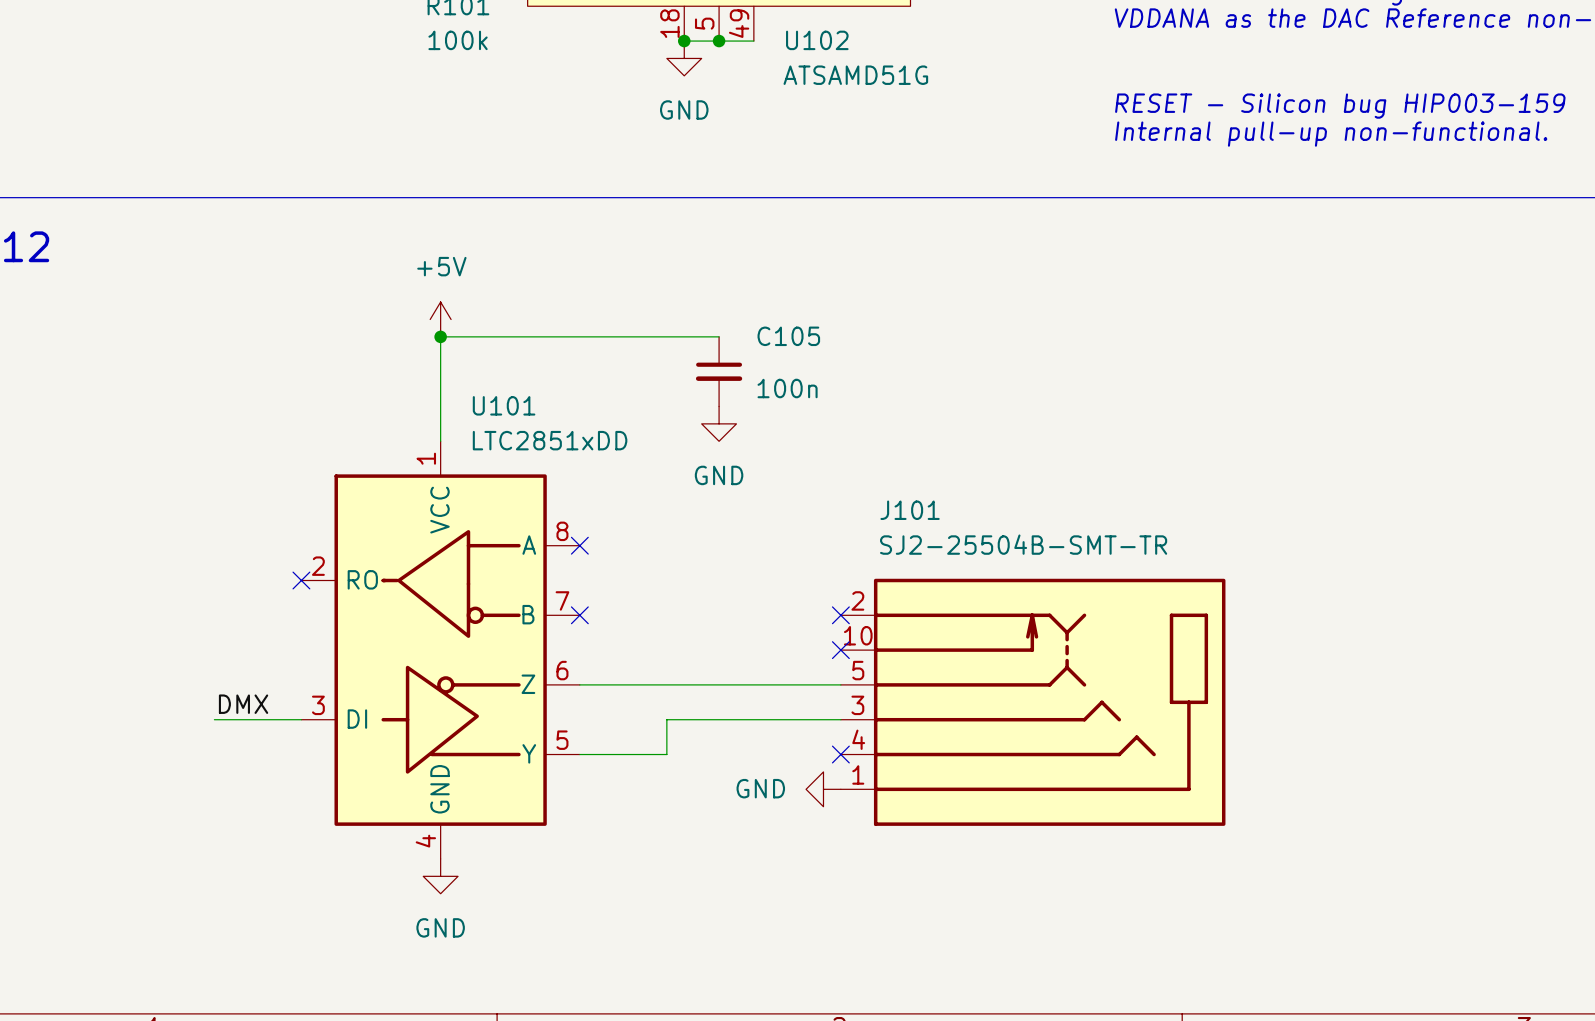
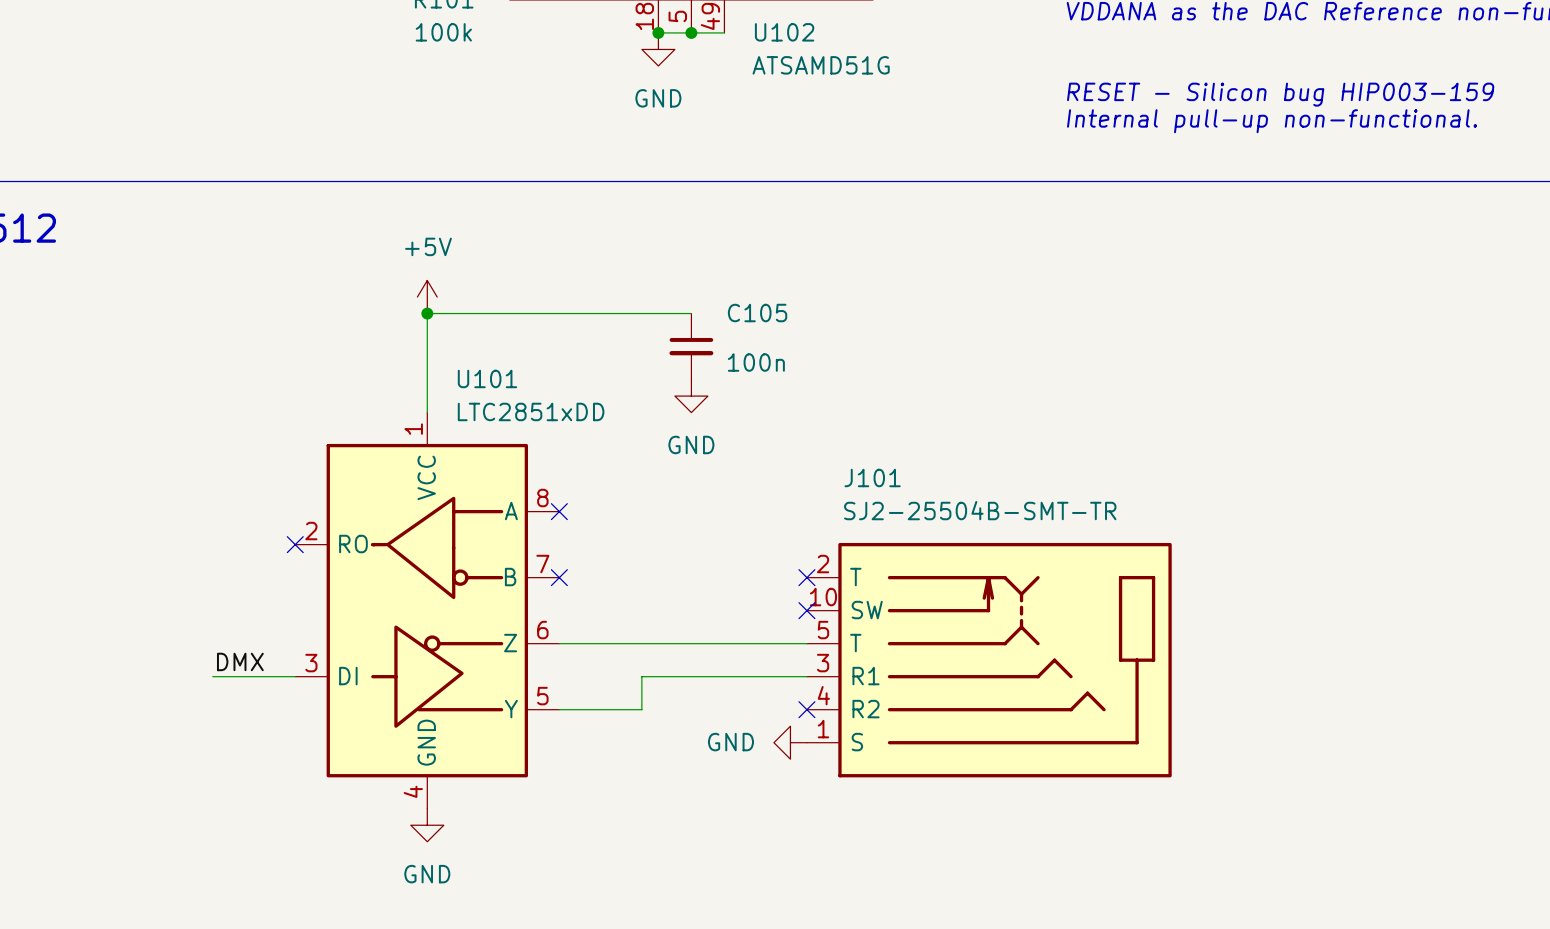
J101 symbol: [840, 578, 1226, 826] -> [806, 542, 1172, 778]

